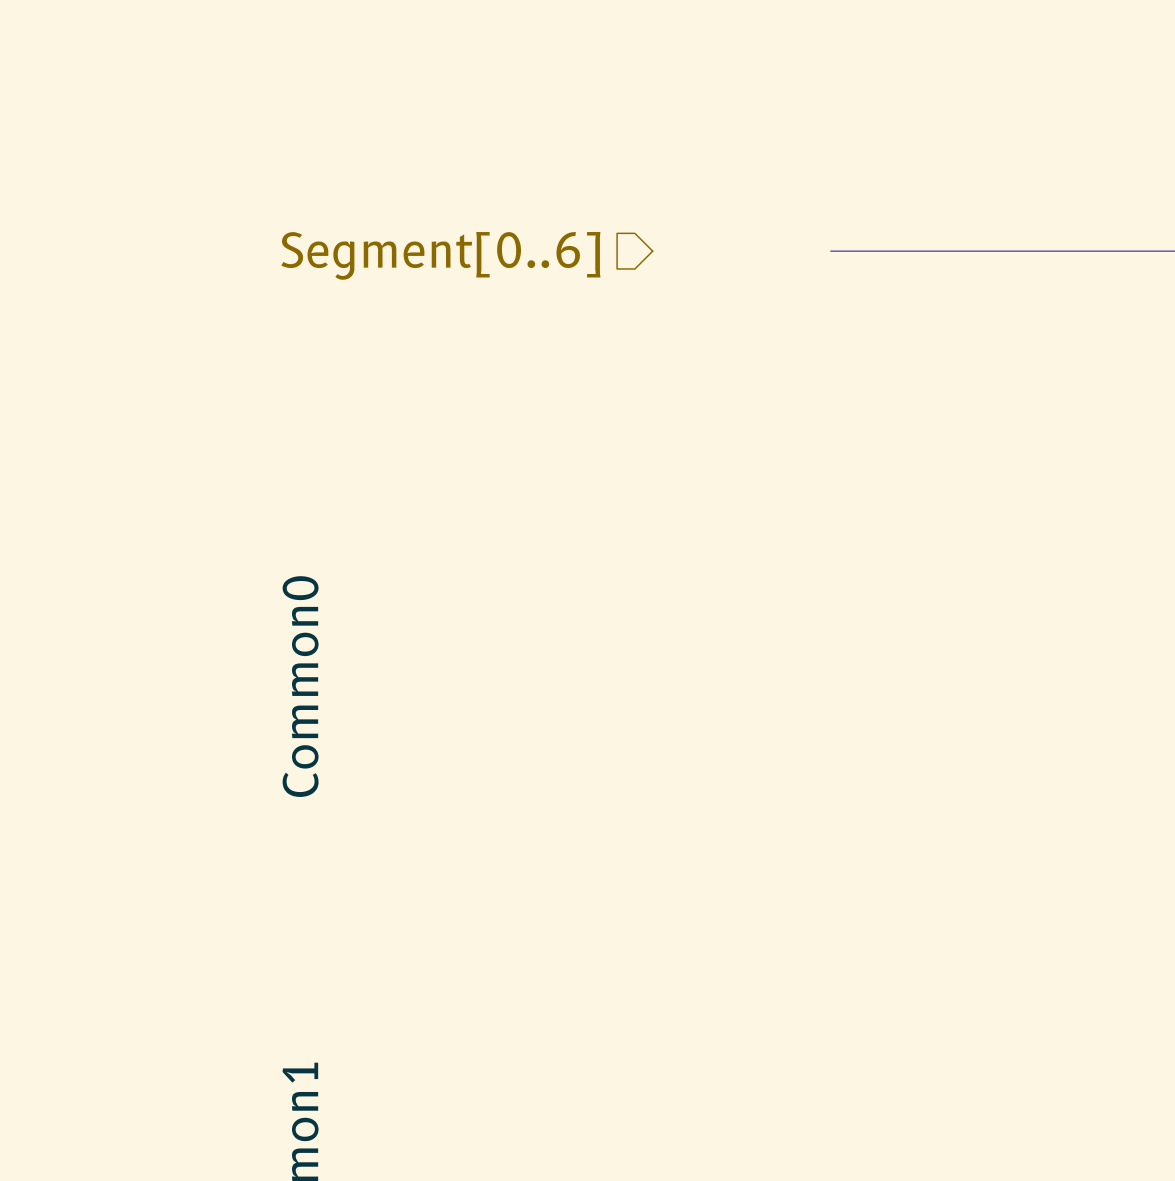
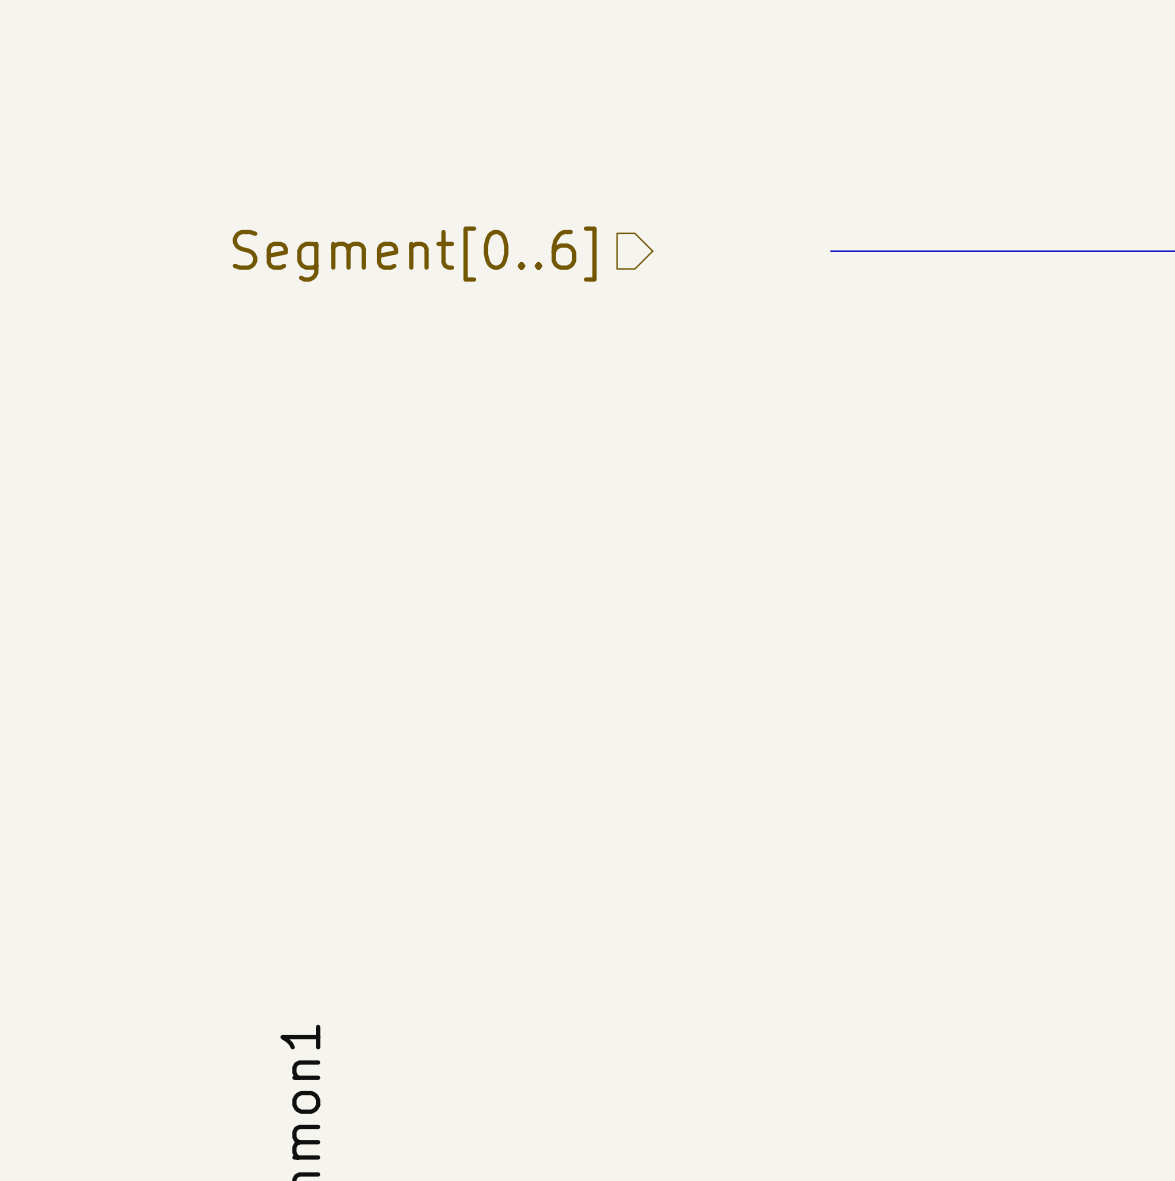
label: Common0 (300, 686) -> none

